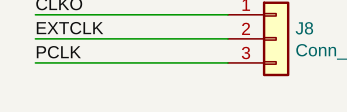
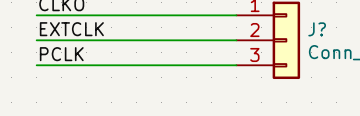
J8 name: J8 (304, 28) -> J? (317, 29)

